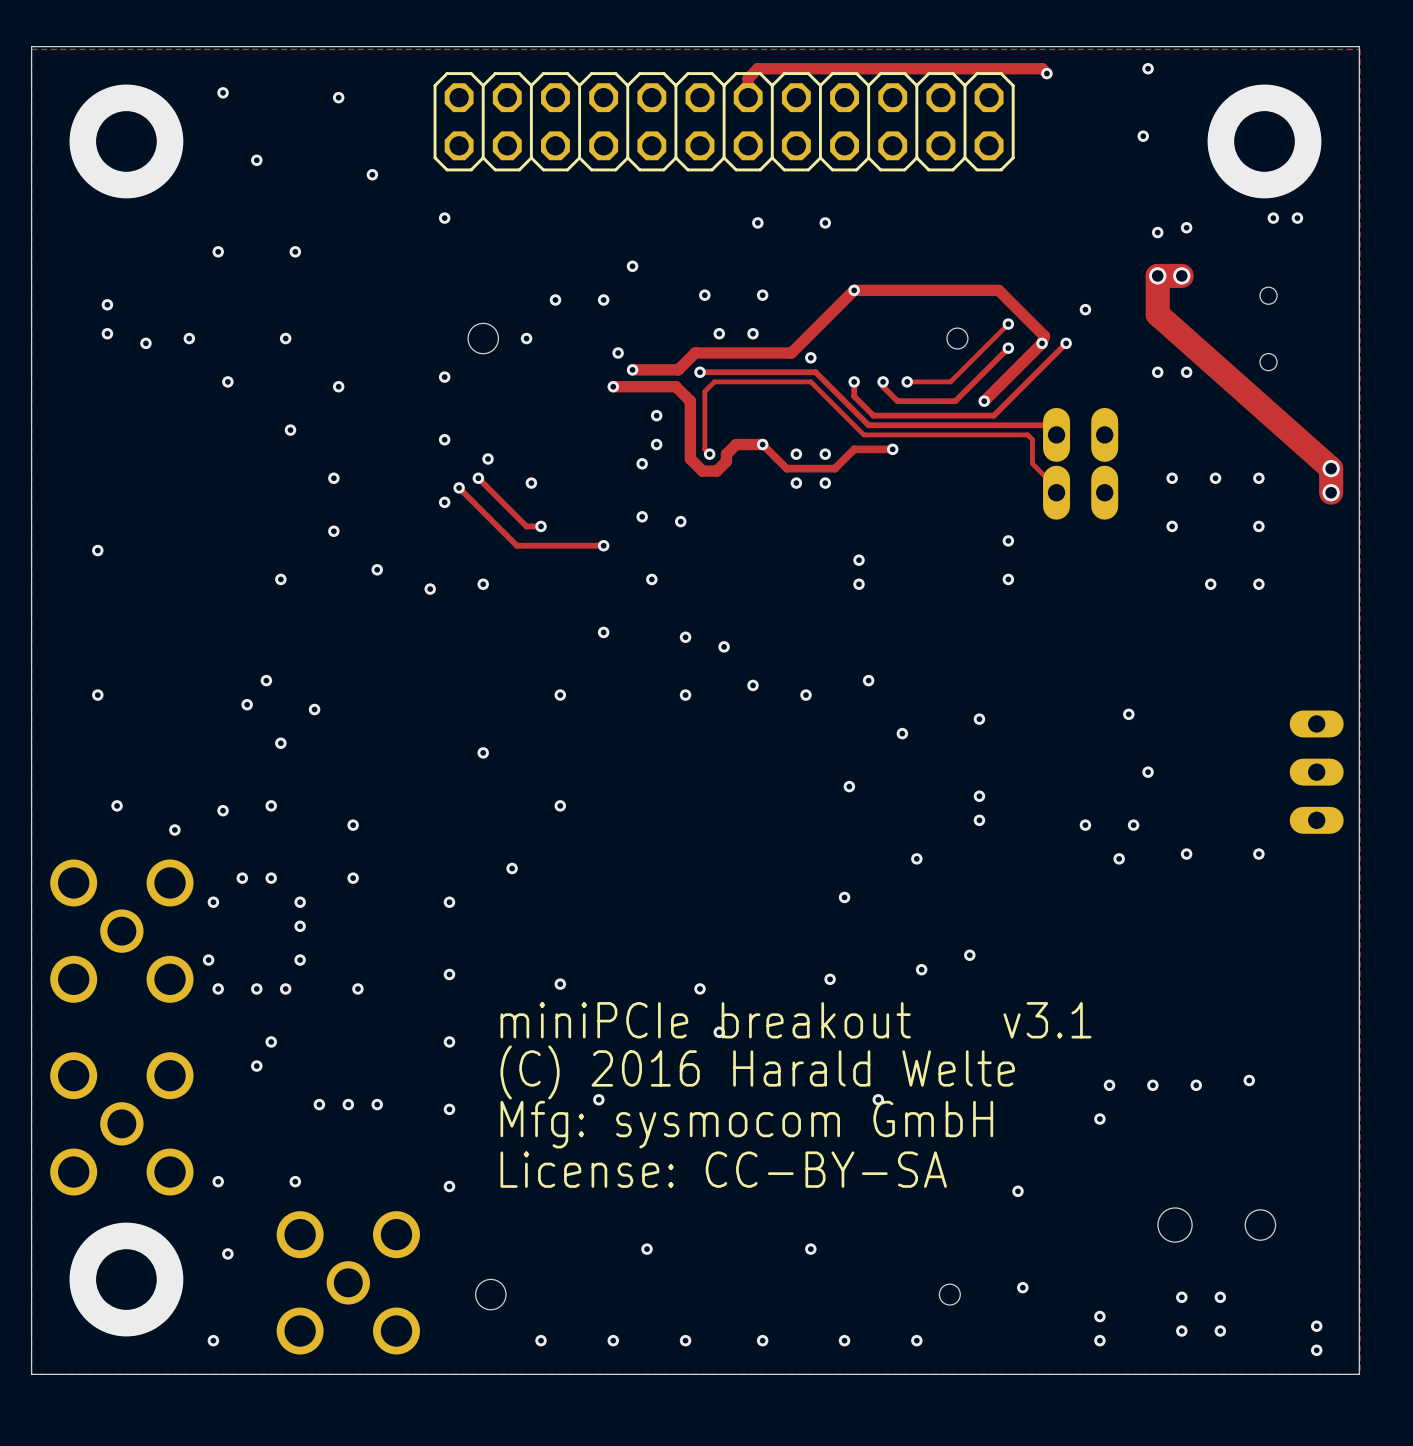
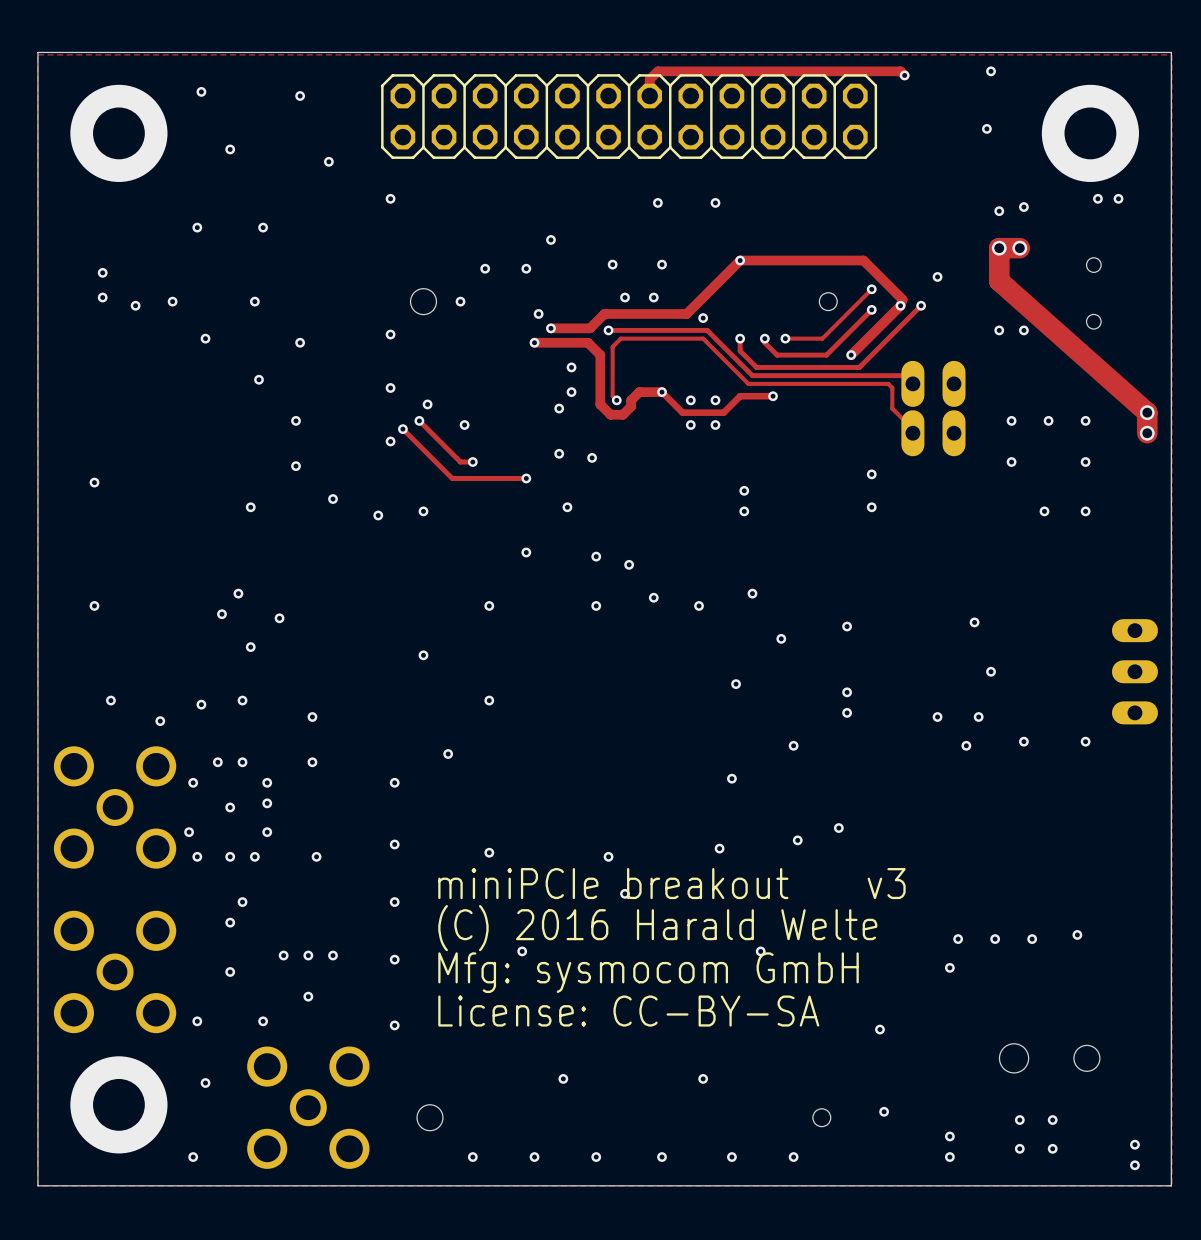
via: none -> (230, 807)
text: v3.1 (1047, 1020) -> v3 (886, 883)
via: none -> (230, 971)
via: none -> (308, 996)

